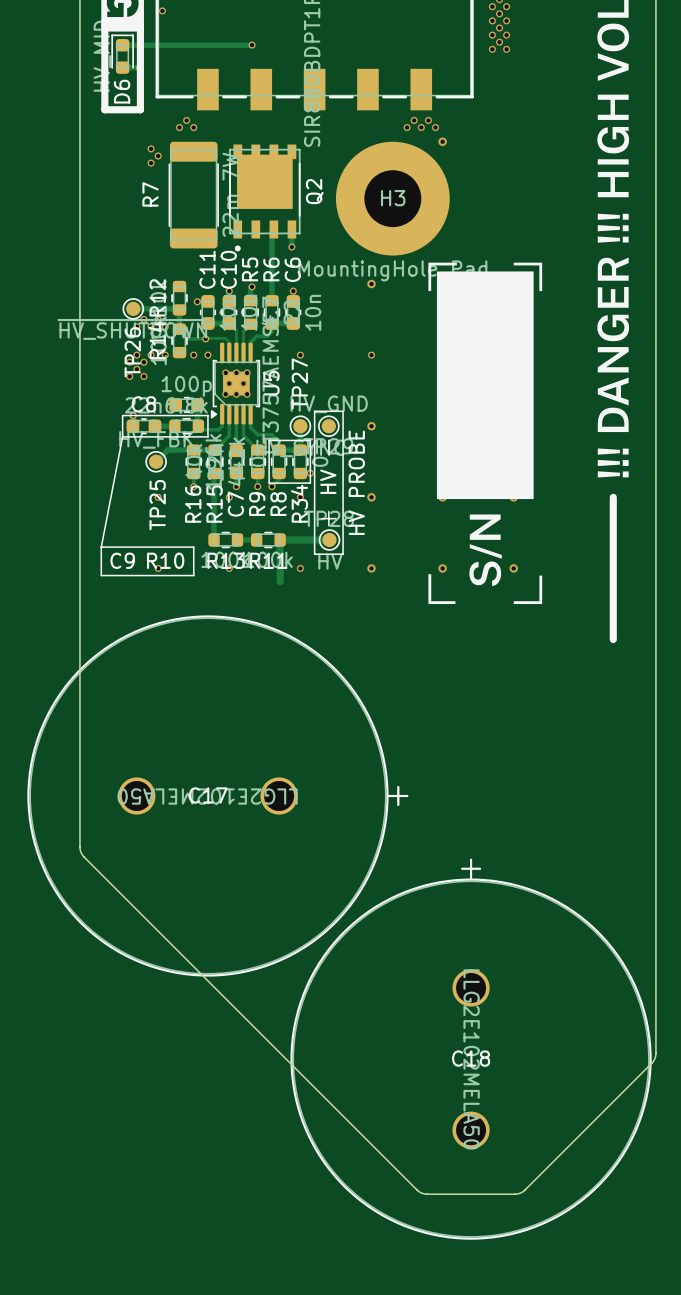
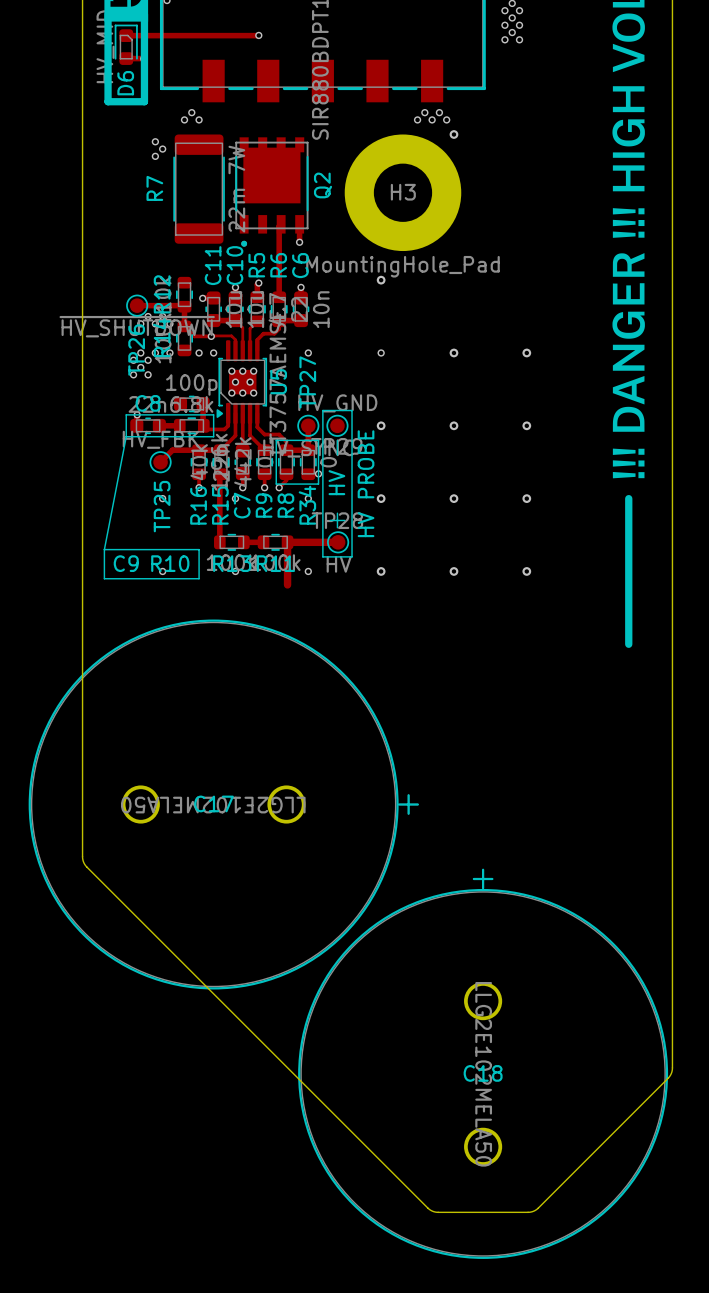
drawing: [428, 262, 543, 605] -> none

